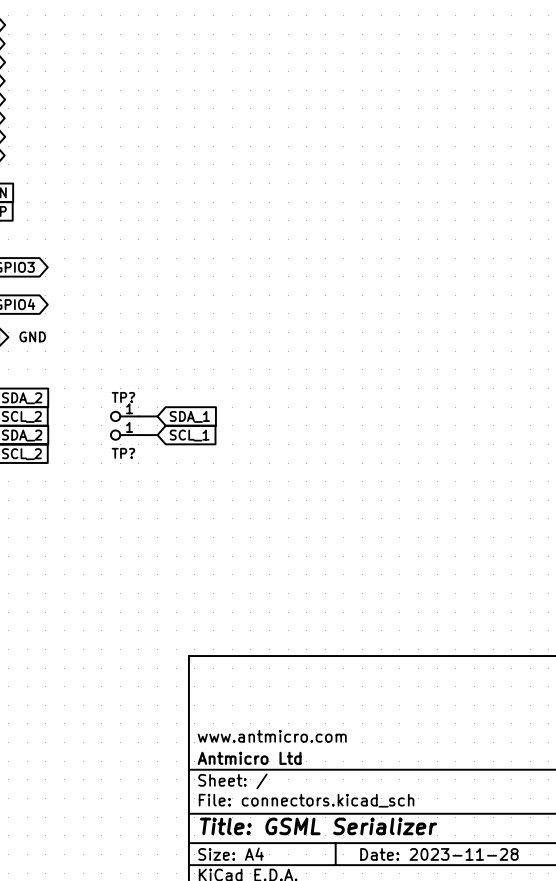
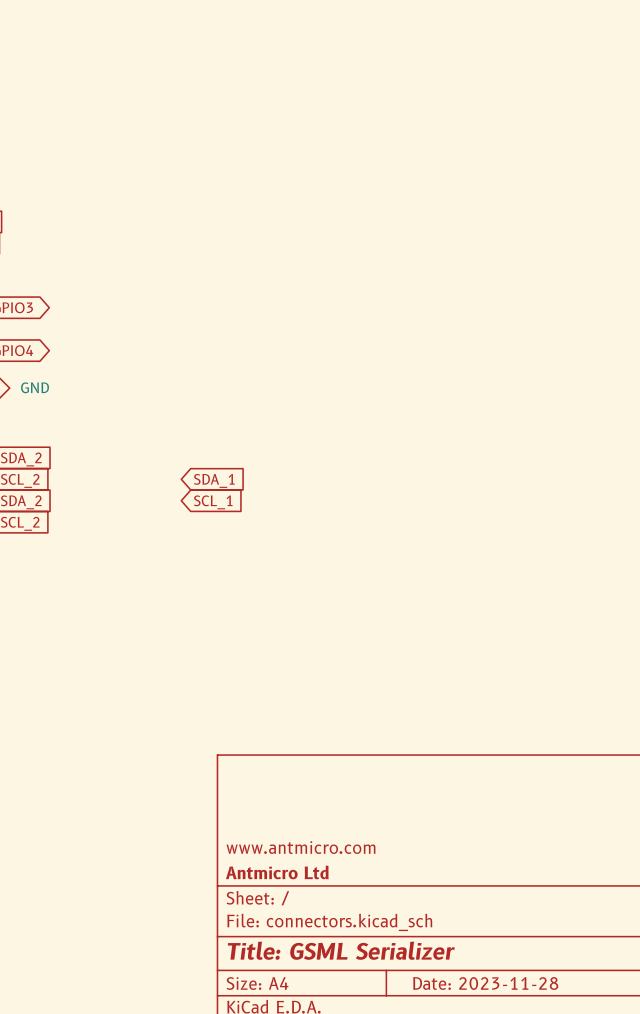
TP?: (124, 416) -> none
wire: (138, 416) (157, 416) -> none
TP?: (124, 435) -> none
wire: (138, 435) (157, 435) -> none

